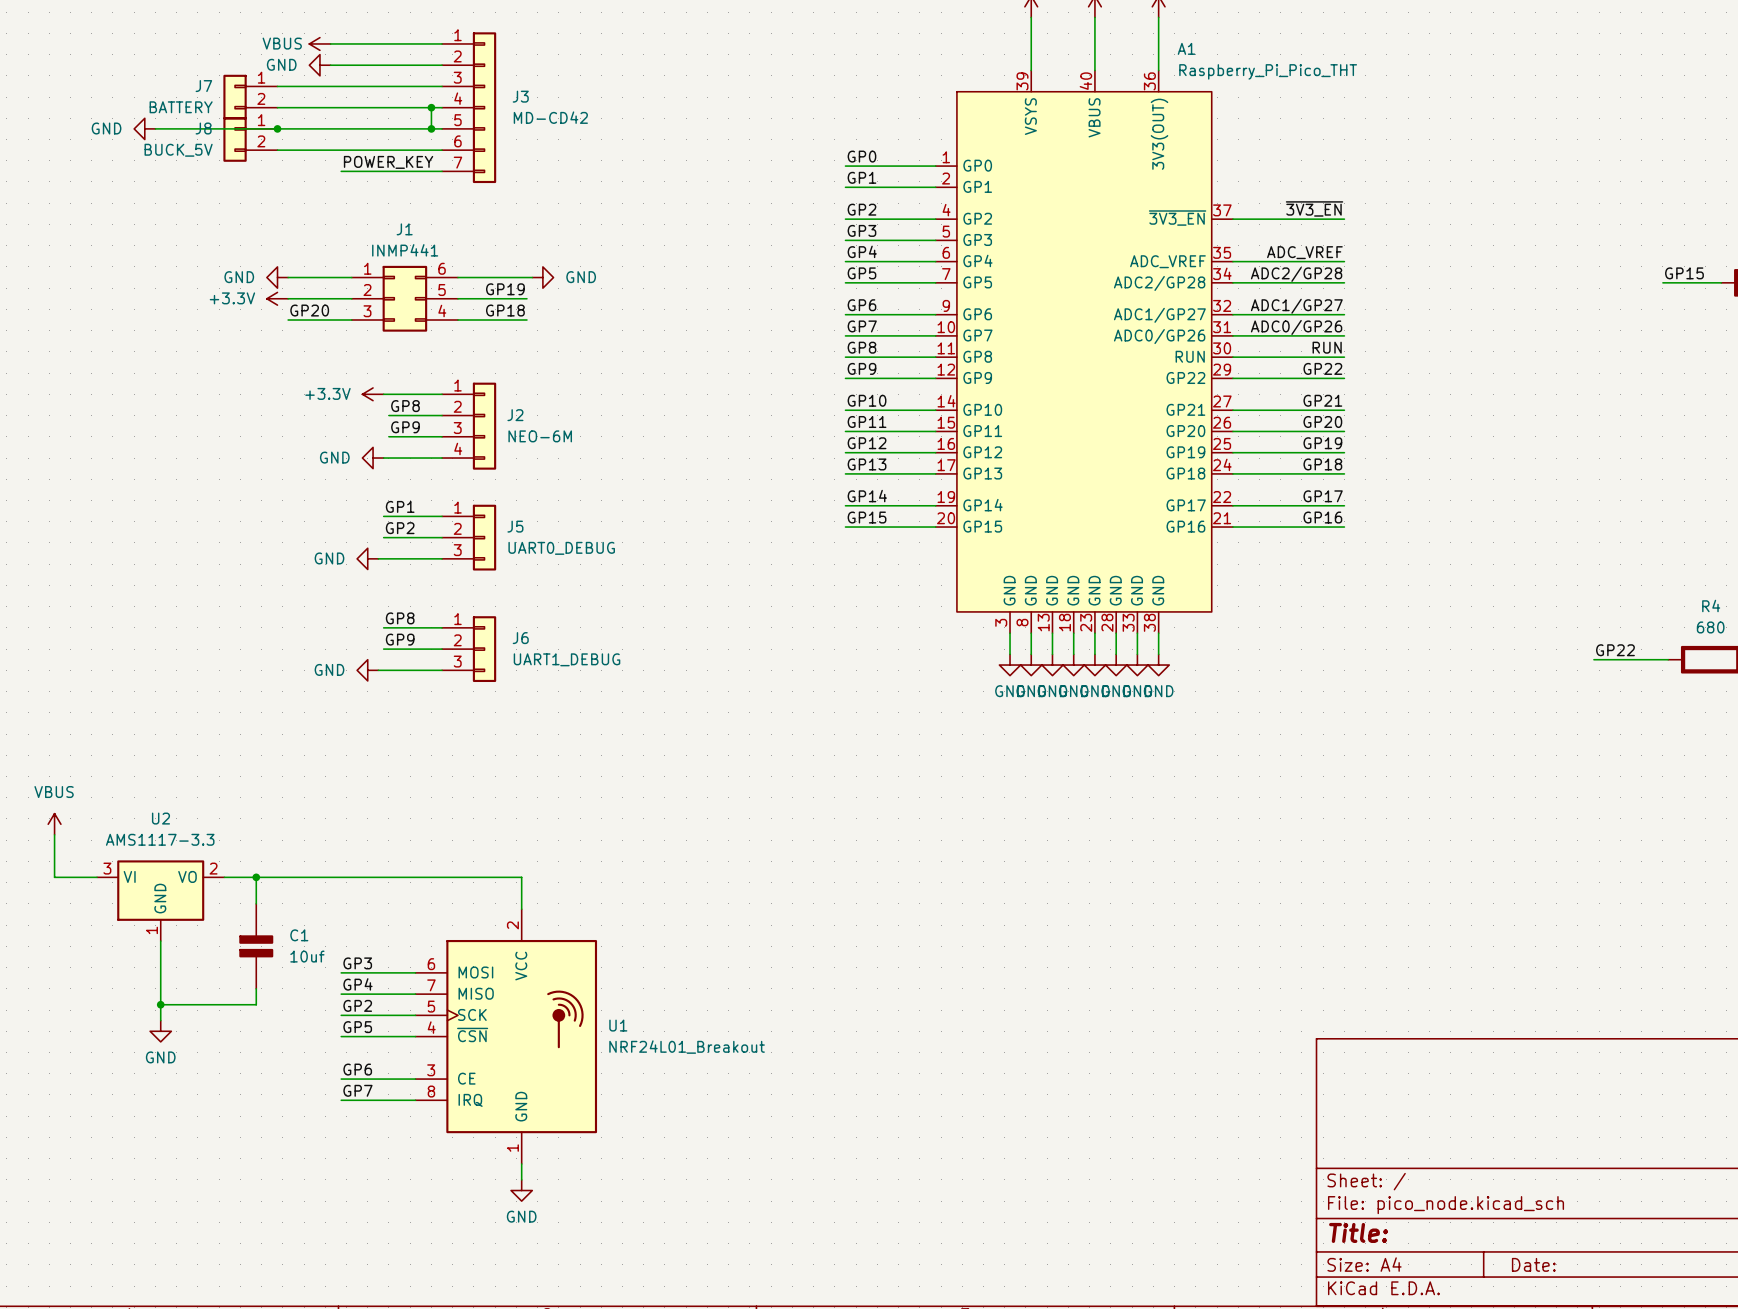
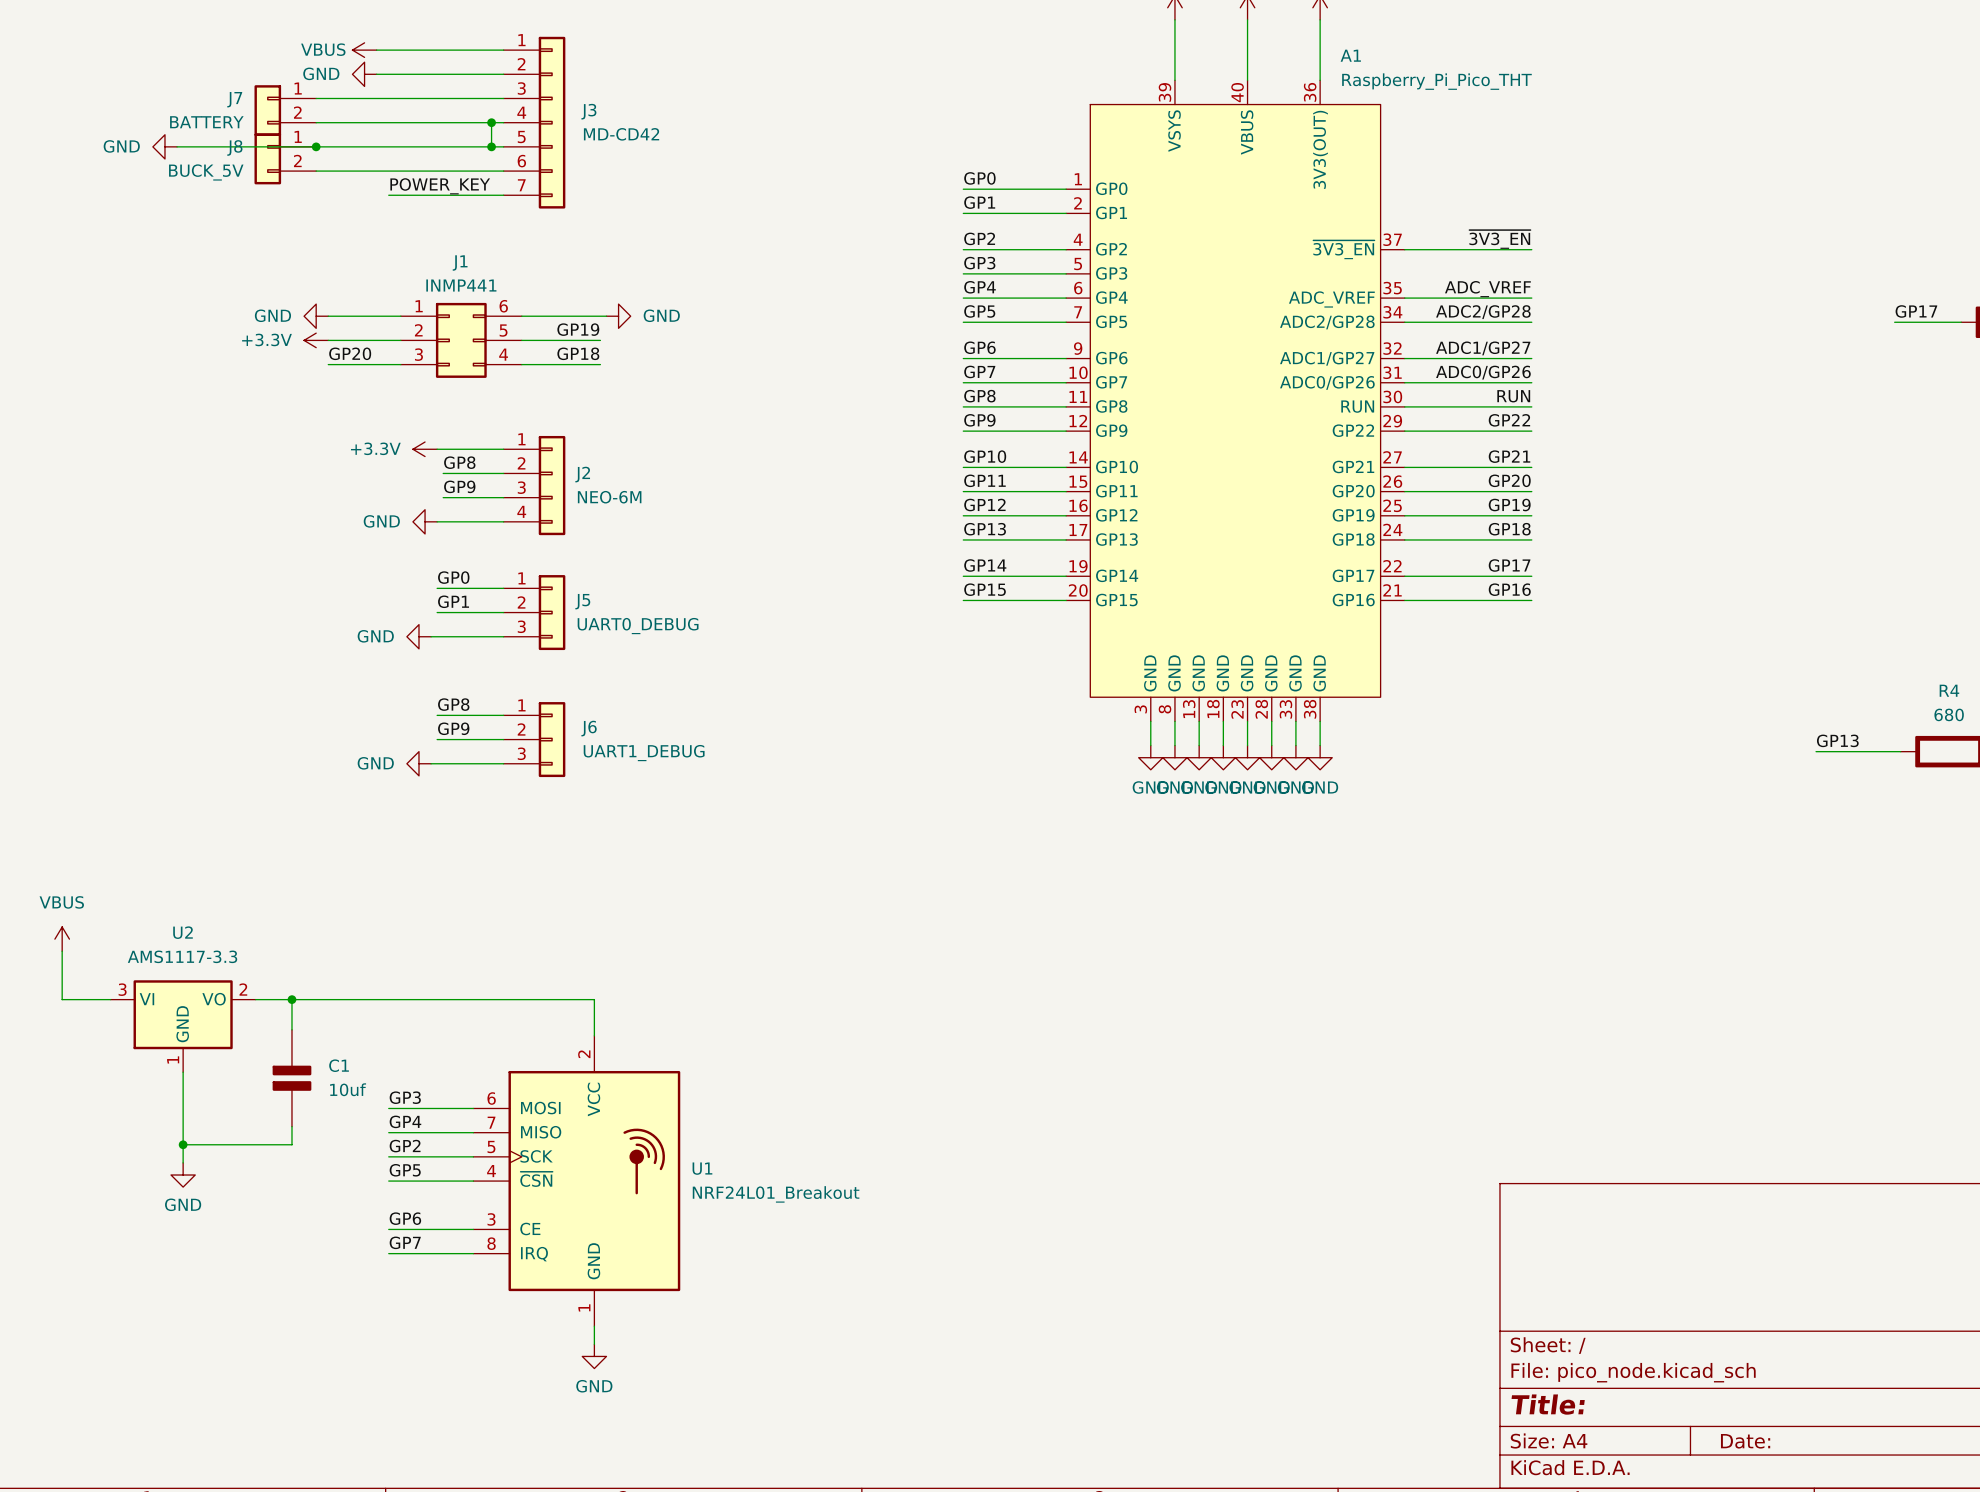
label: GP15 (1684, 273) -> GP17 (1916, 311)
label: GP1 (400, 506) -> GP0 (453, 577)
label: GP2 (400, 528) -> GP1 (453, 601)
label: GP22 (1615, 650) -> GP13 (1837, 740)

